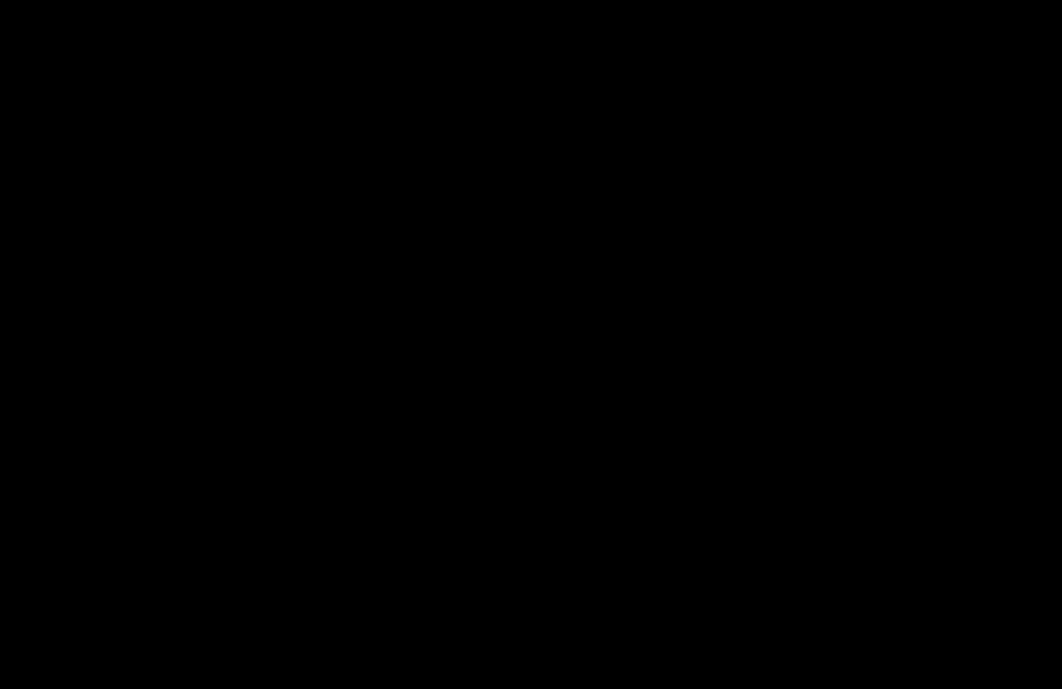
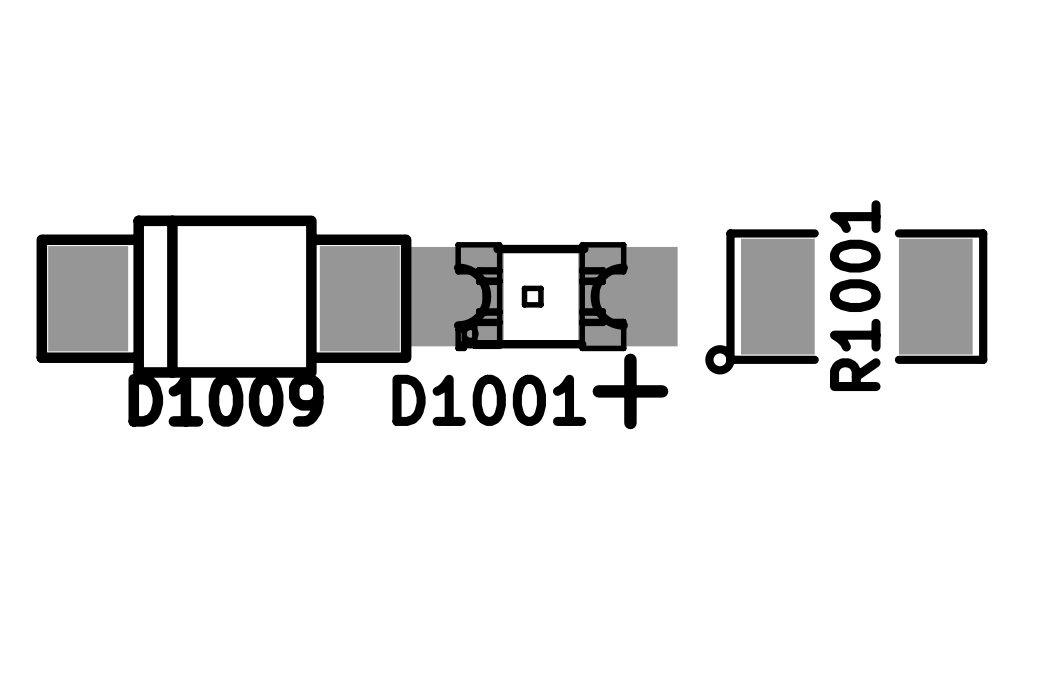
D1009: none -> (223, 296)
R1001: none -> (846, 301)
D1001: none -> (540, 335)

